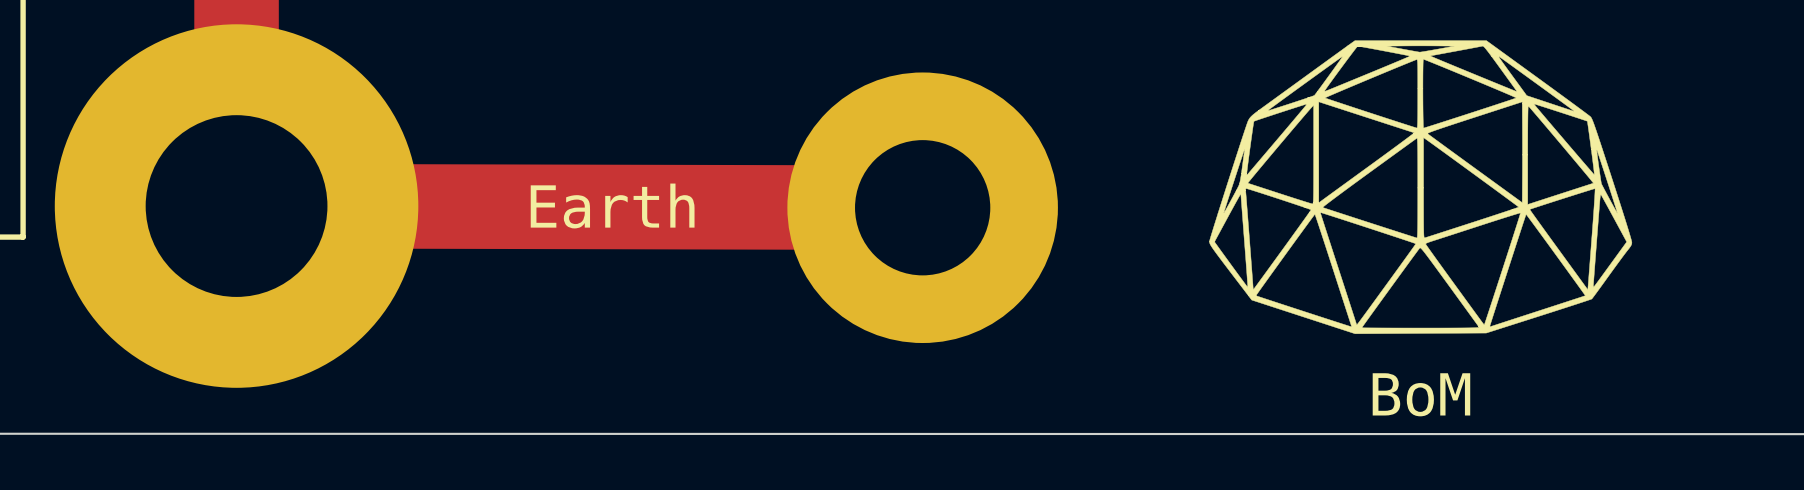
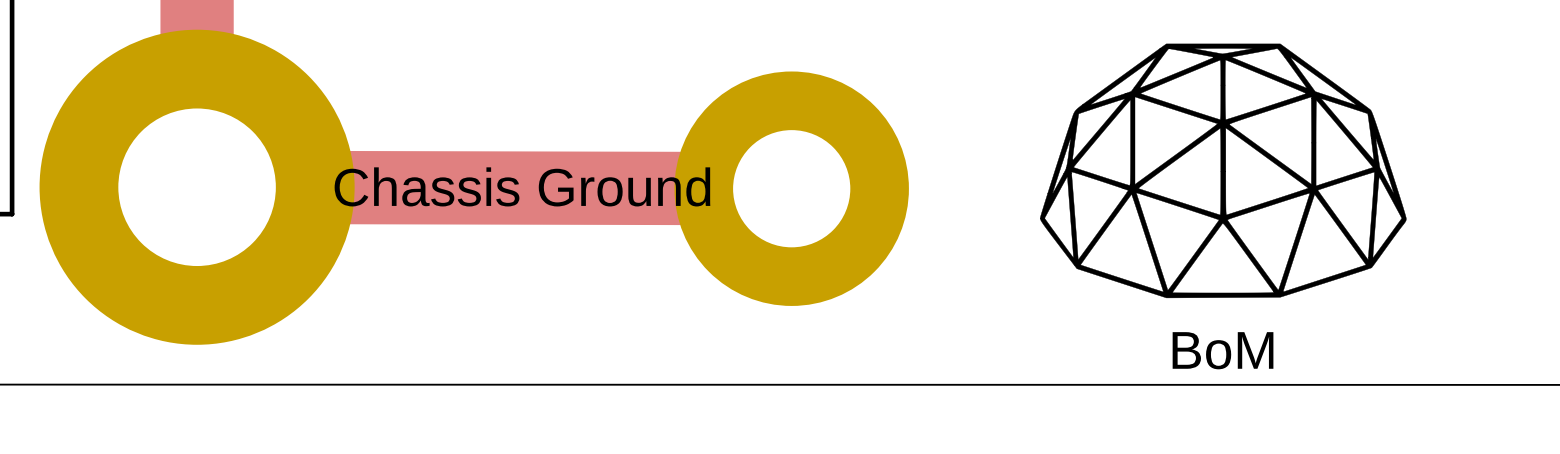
part value: Earth (612, 205) -> Chassis Ground (522, 186)

